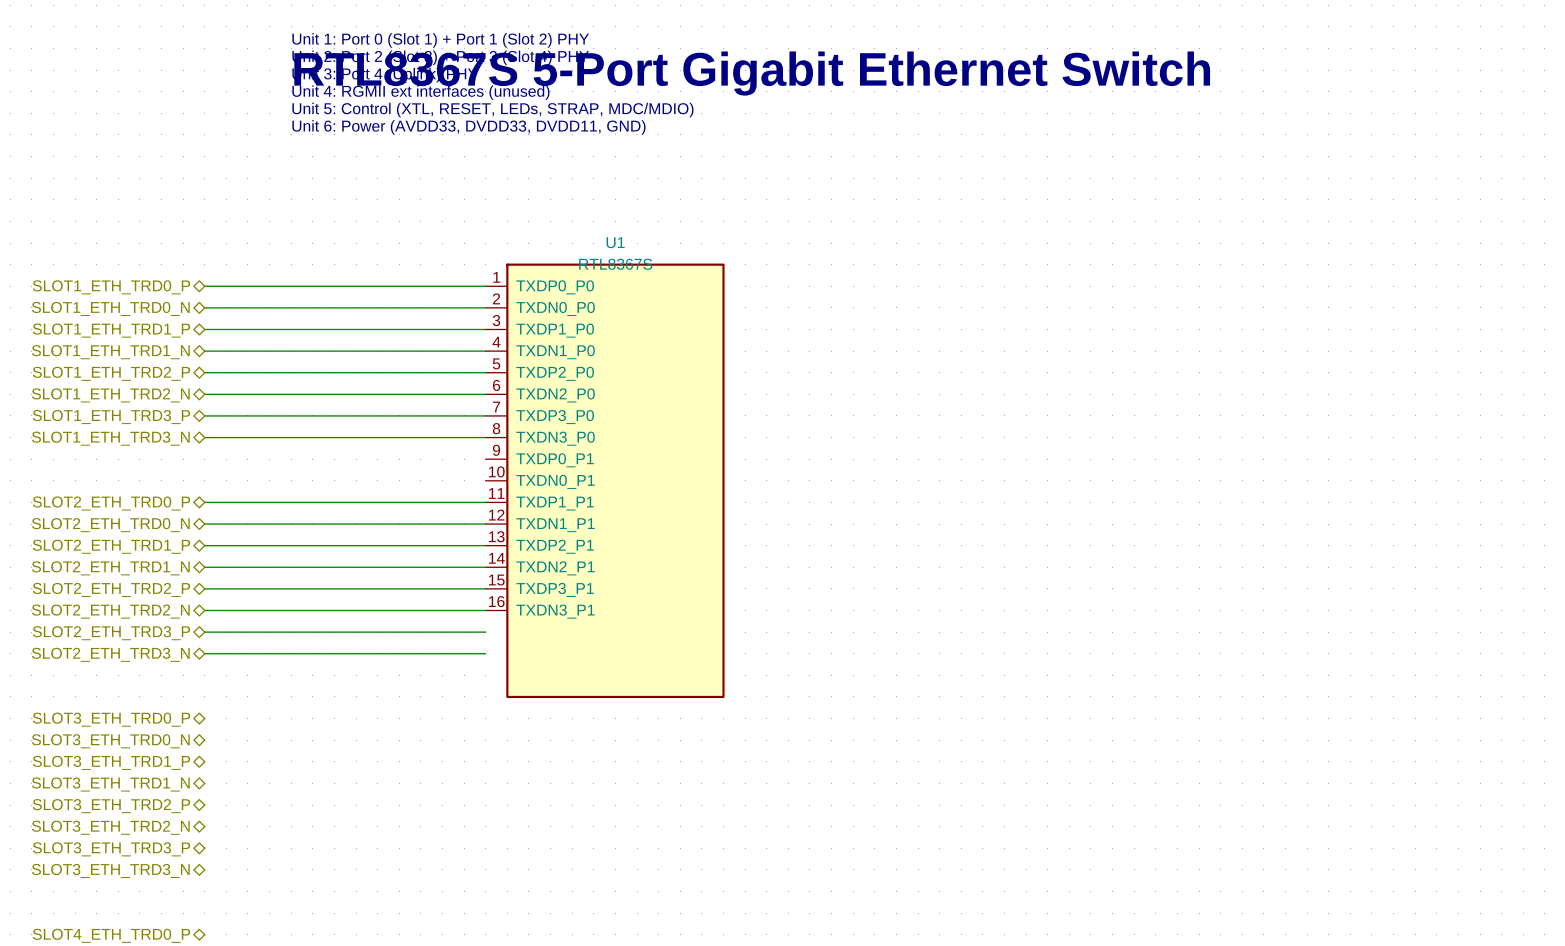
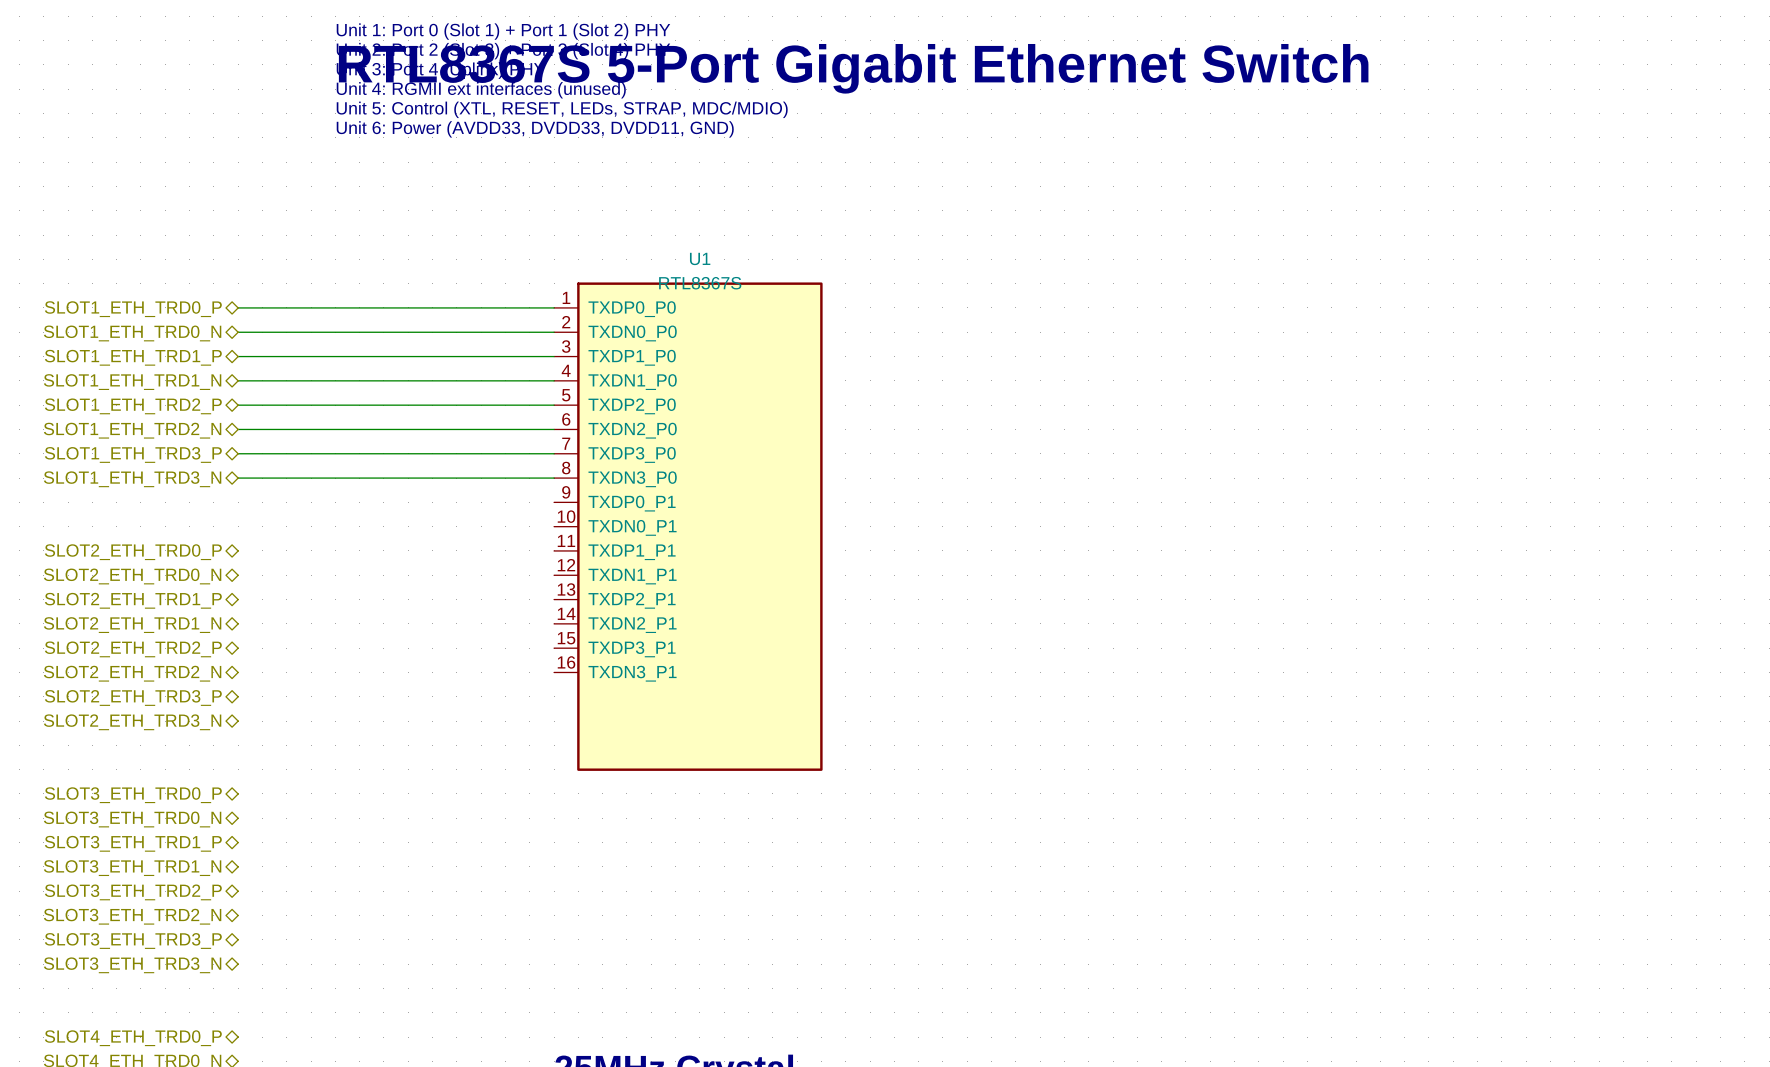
wire: (204, 502) (485, 502) -> none
wire: (204, 524) (485, 524) -> none
wire: (204, 545) (485, 545) -> none
wire: (204, 567) (485, 567) -> none
wire: (204, 588) (485, 588) -> none
wire: (204, 610) (485, 610) -> none
wire: (204, 632) (485, 632) -> none
wire: (204, 653) (485, 653) -> none

